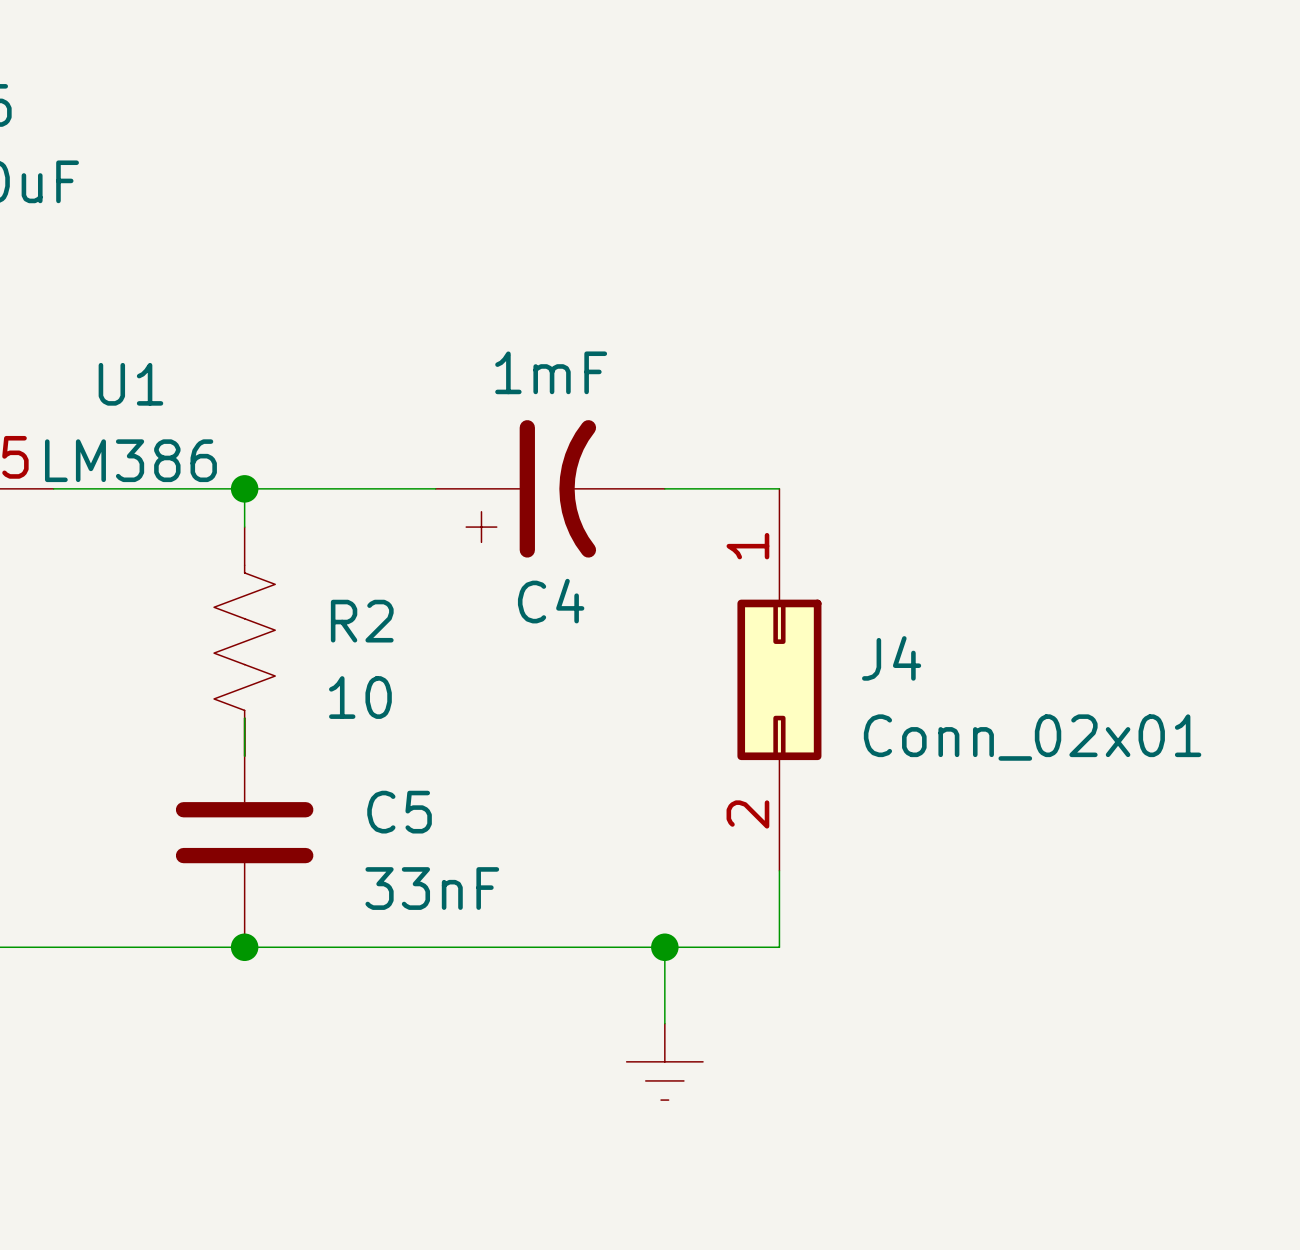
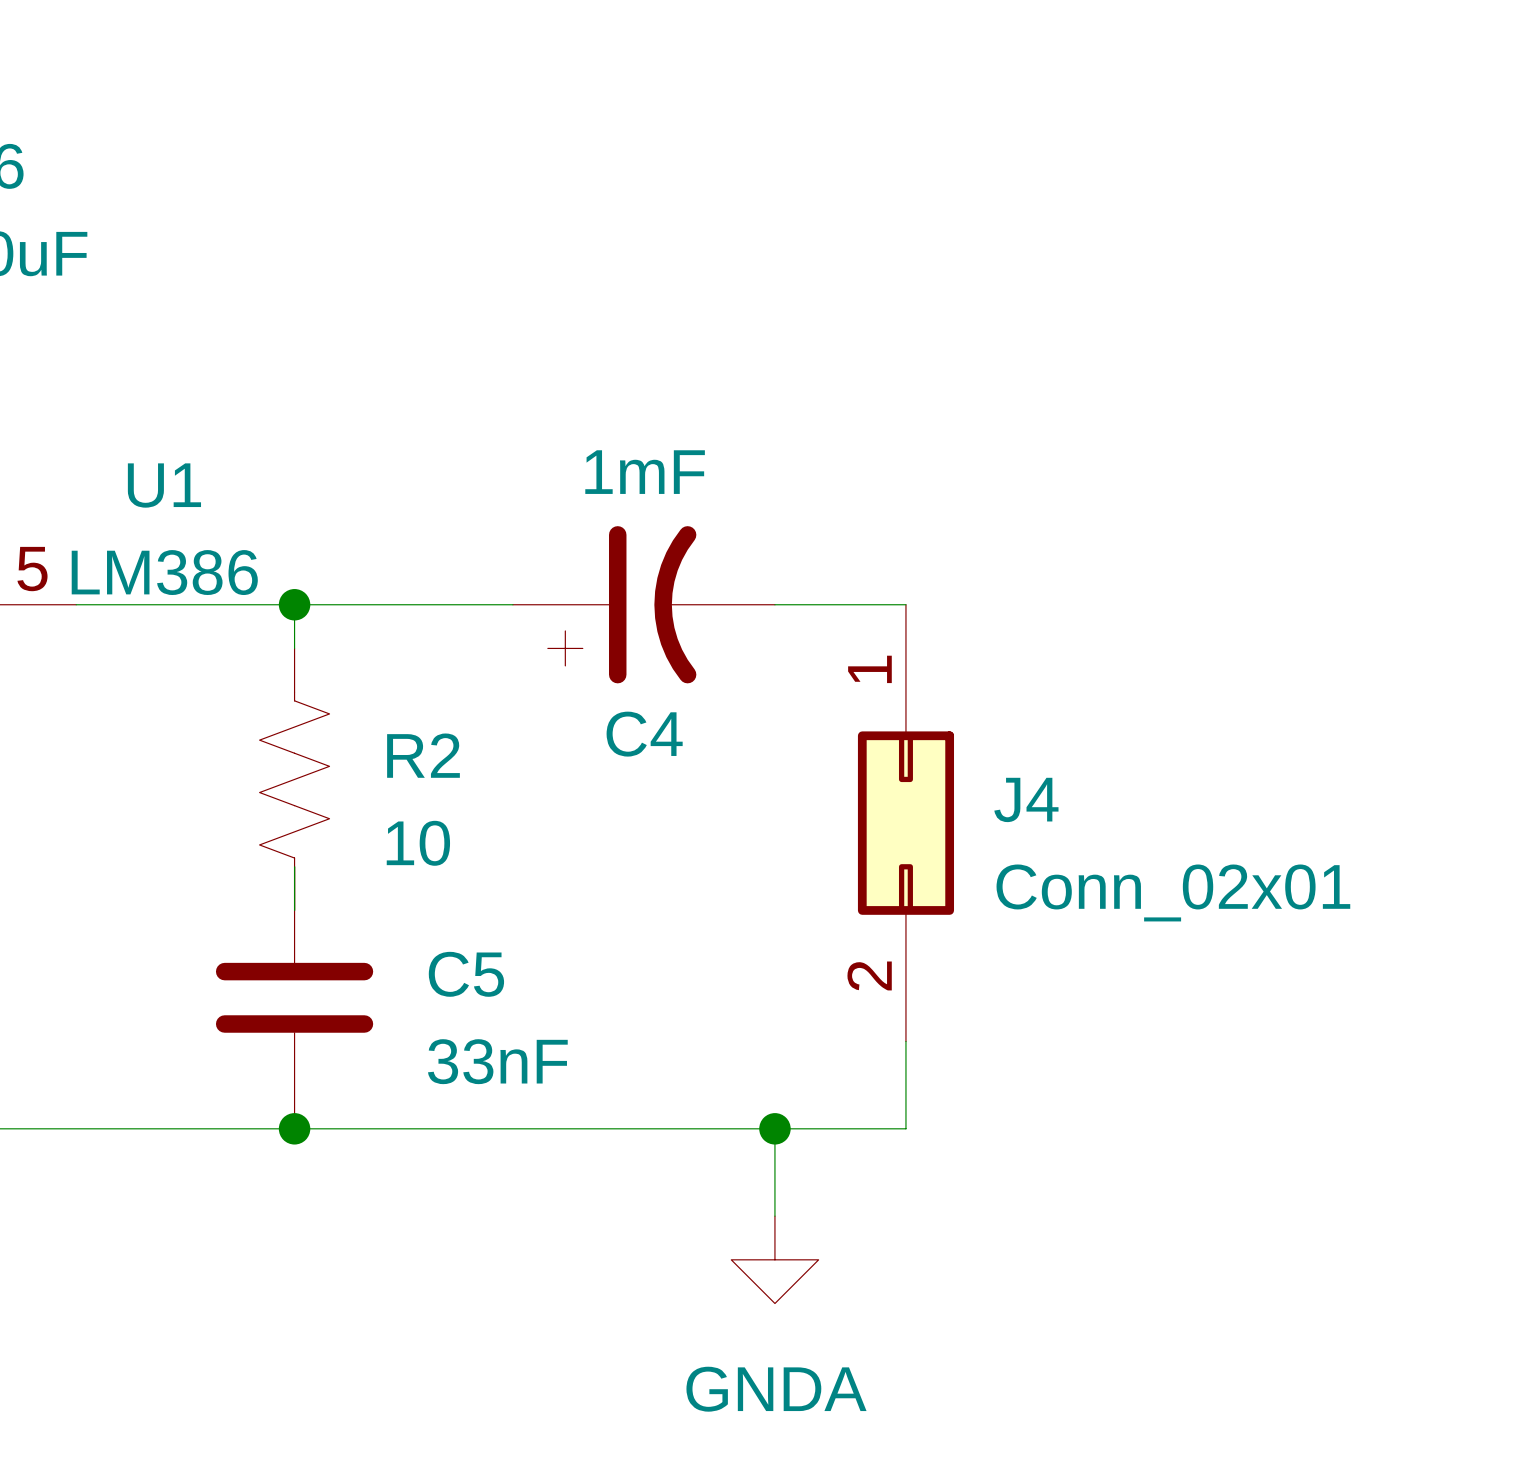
power symbol shape: [626, 1023, 704, 1101] -> [731, 1216, 819, 1304]
power symbol text: none -> GNDA (776, 1389)

